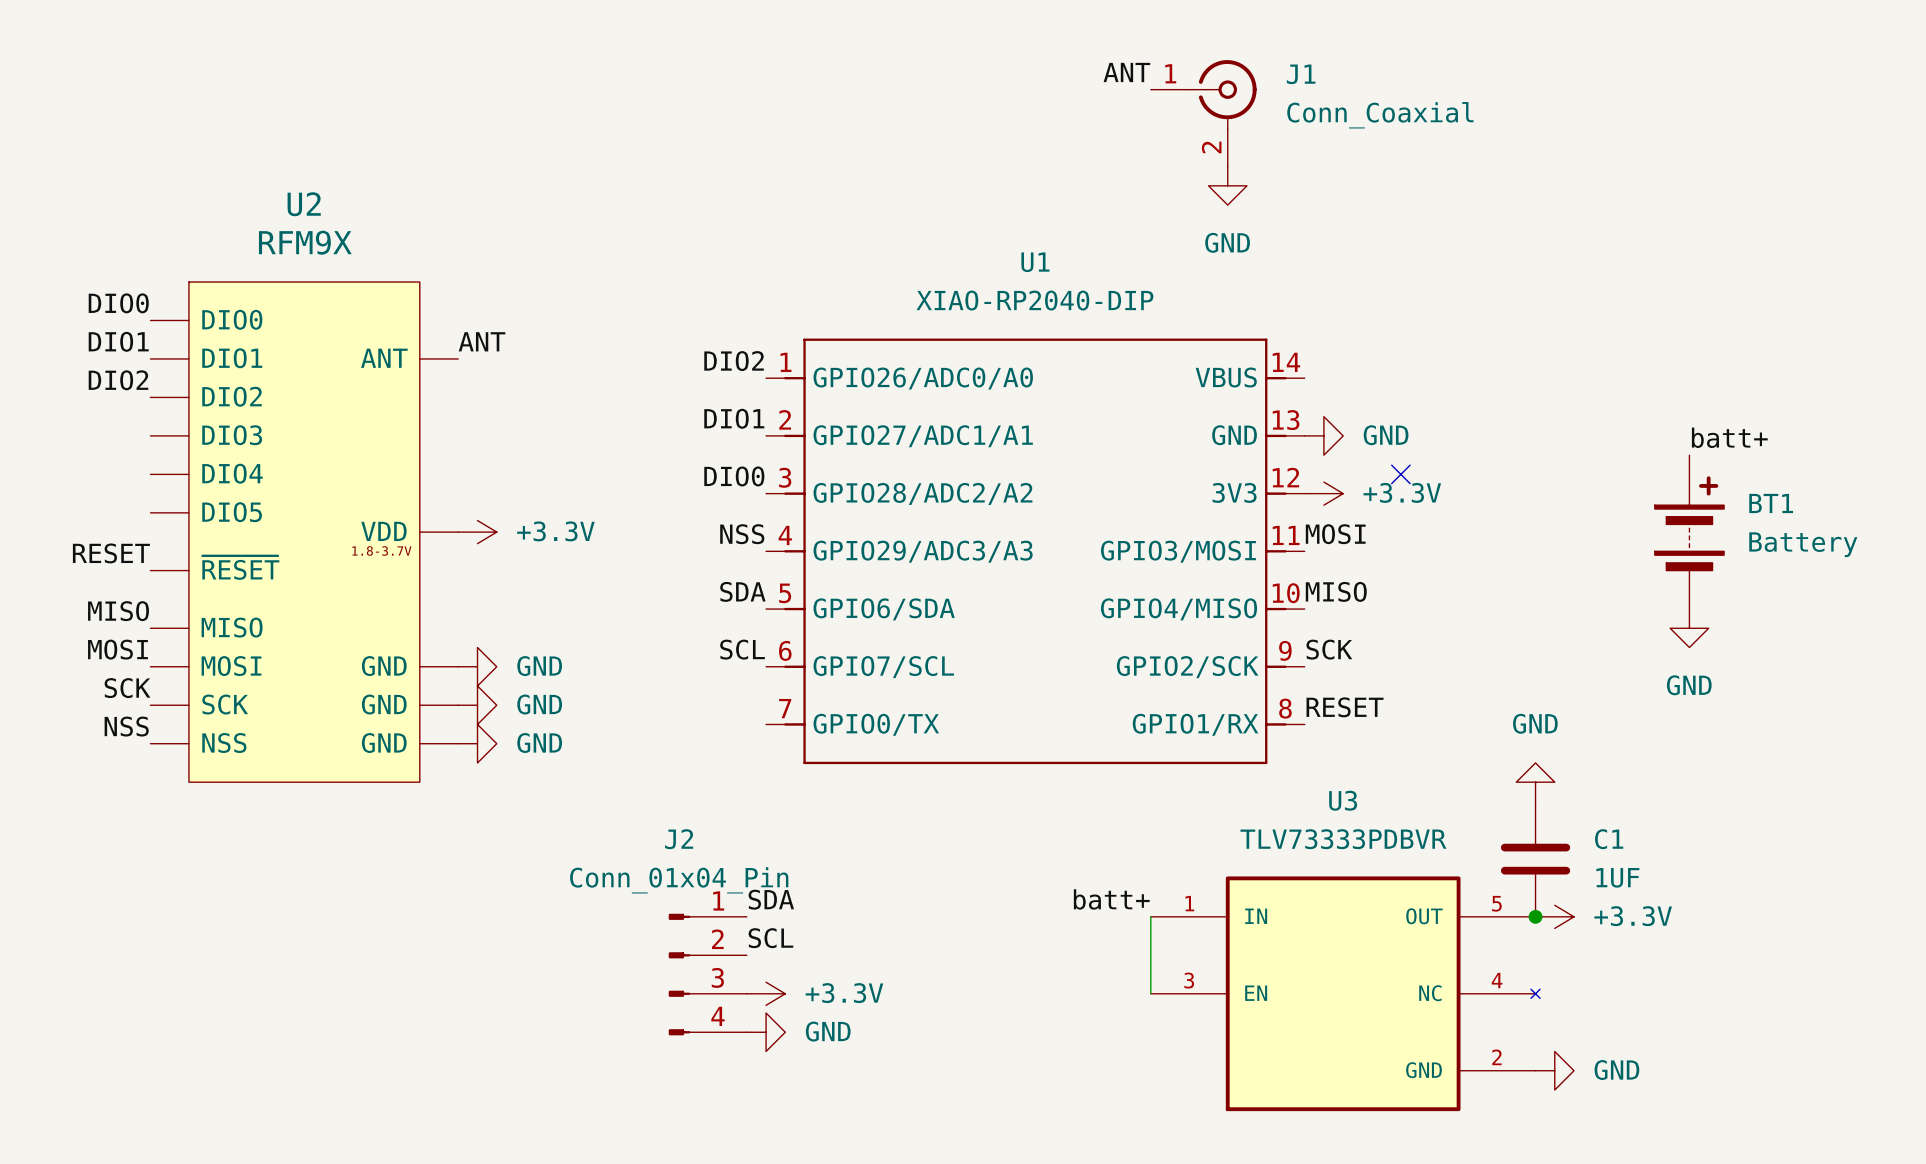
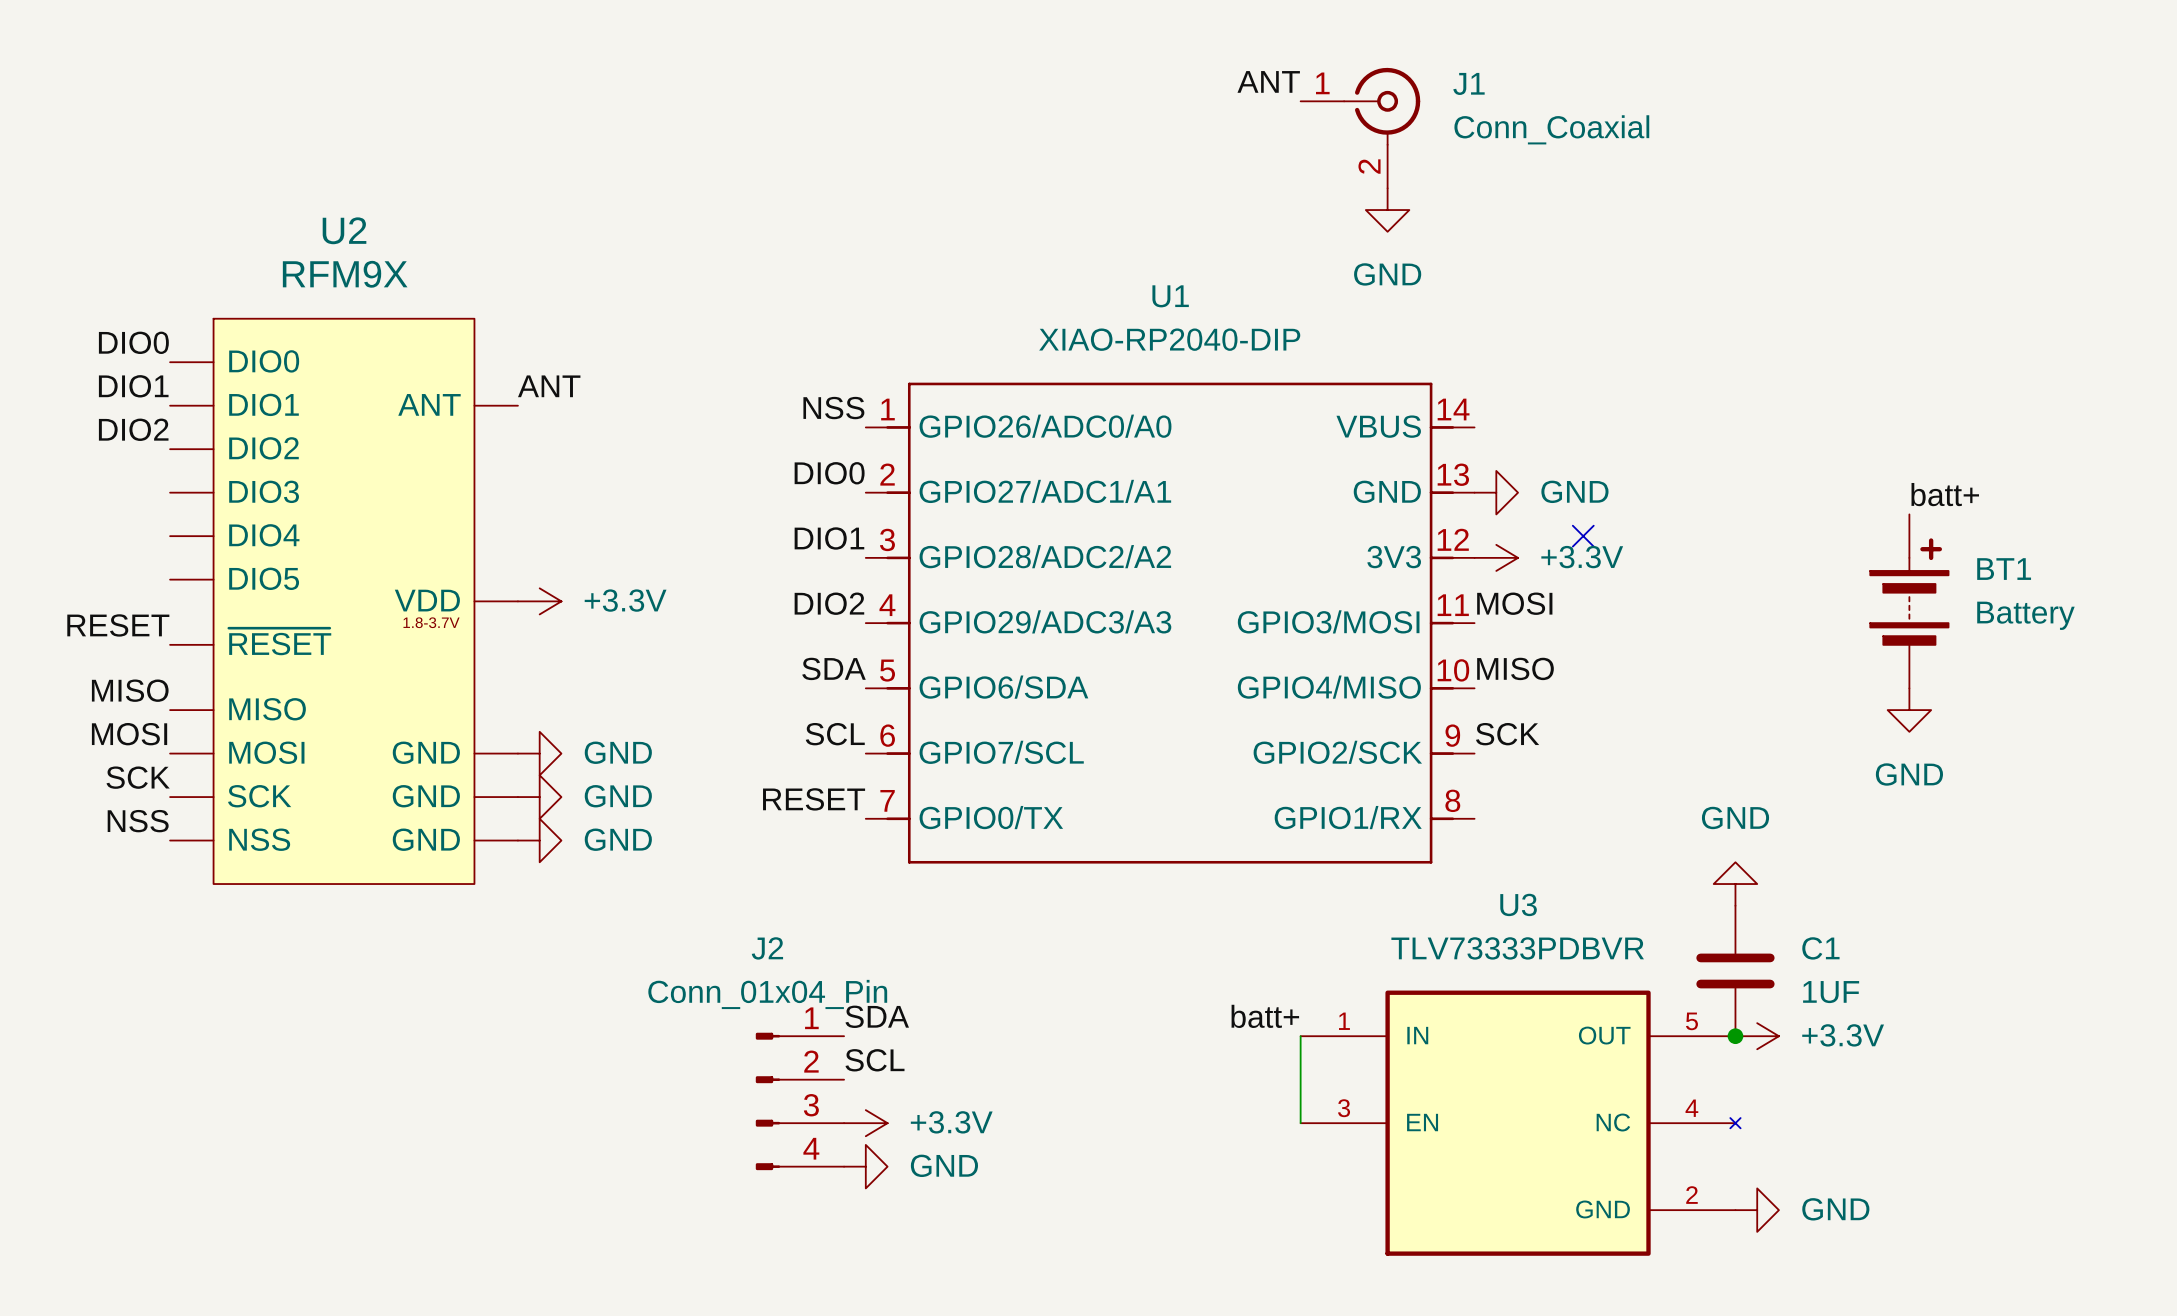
label: DIO2 (734, 361) -> NSS (833, 408)
label: DIO1 (734, 418) -> DIO0 (829, 473)
label: DIO0 (734, 476) -> DIO1 (829, 538)
label: NSS (742, 534) -> DIO2 (829, 603)
label: none -> RESET (814, 799)
label: RESET (1345, 707) -> none

